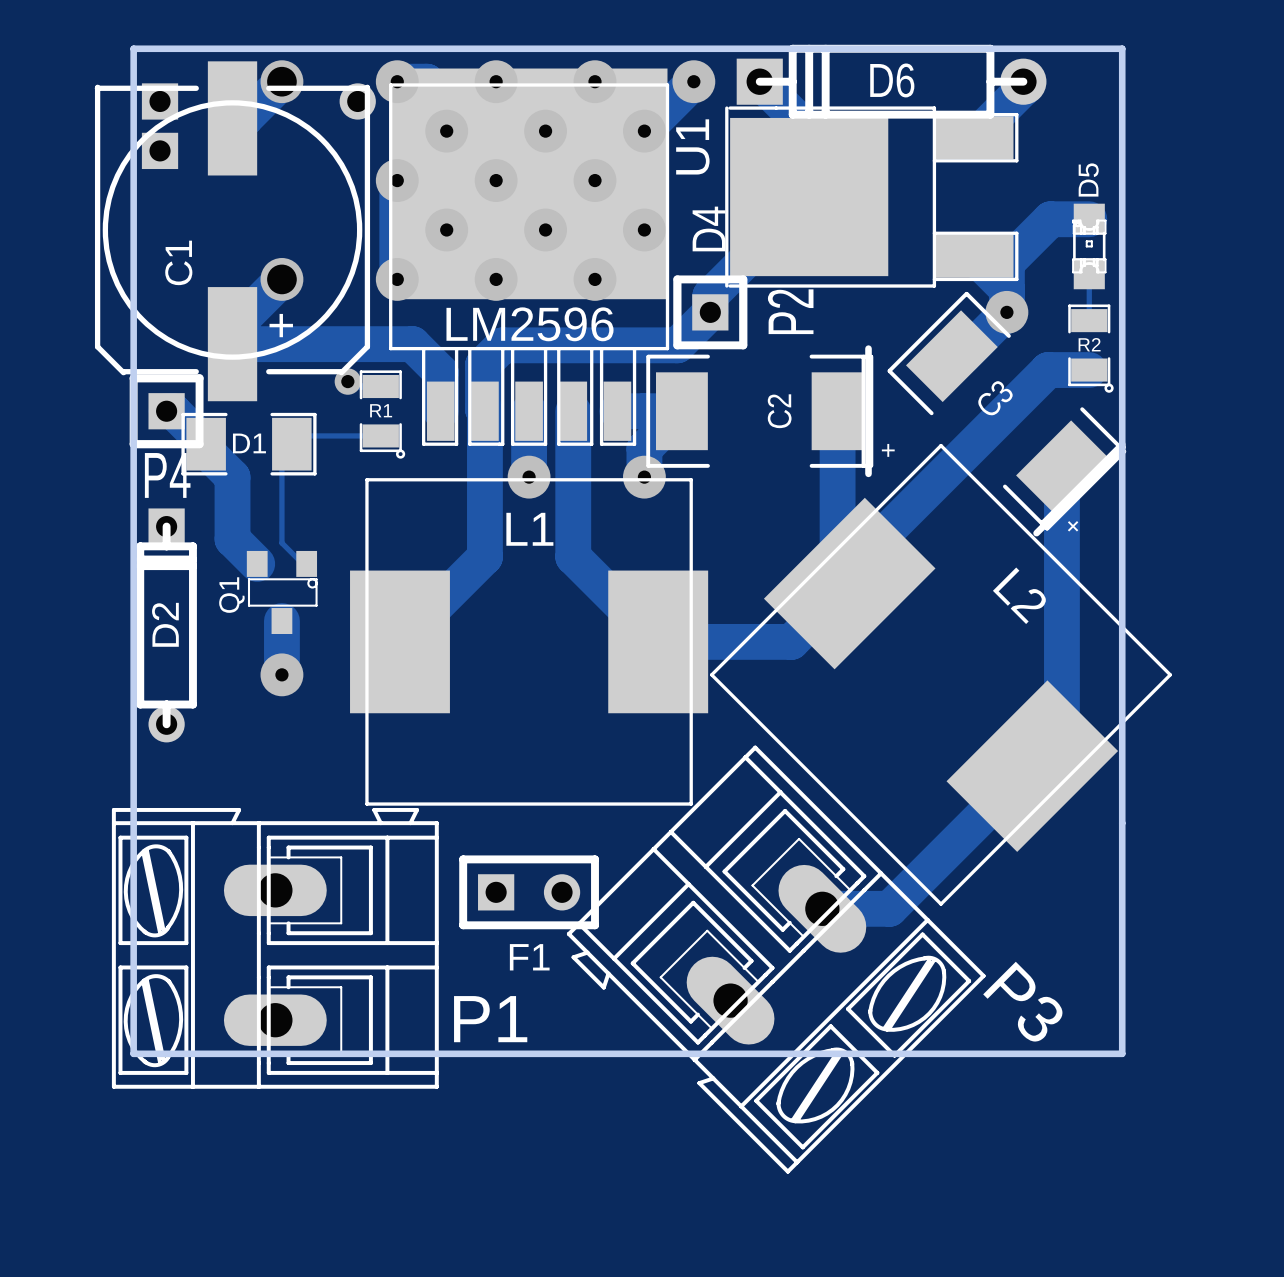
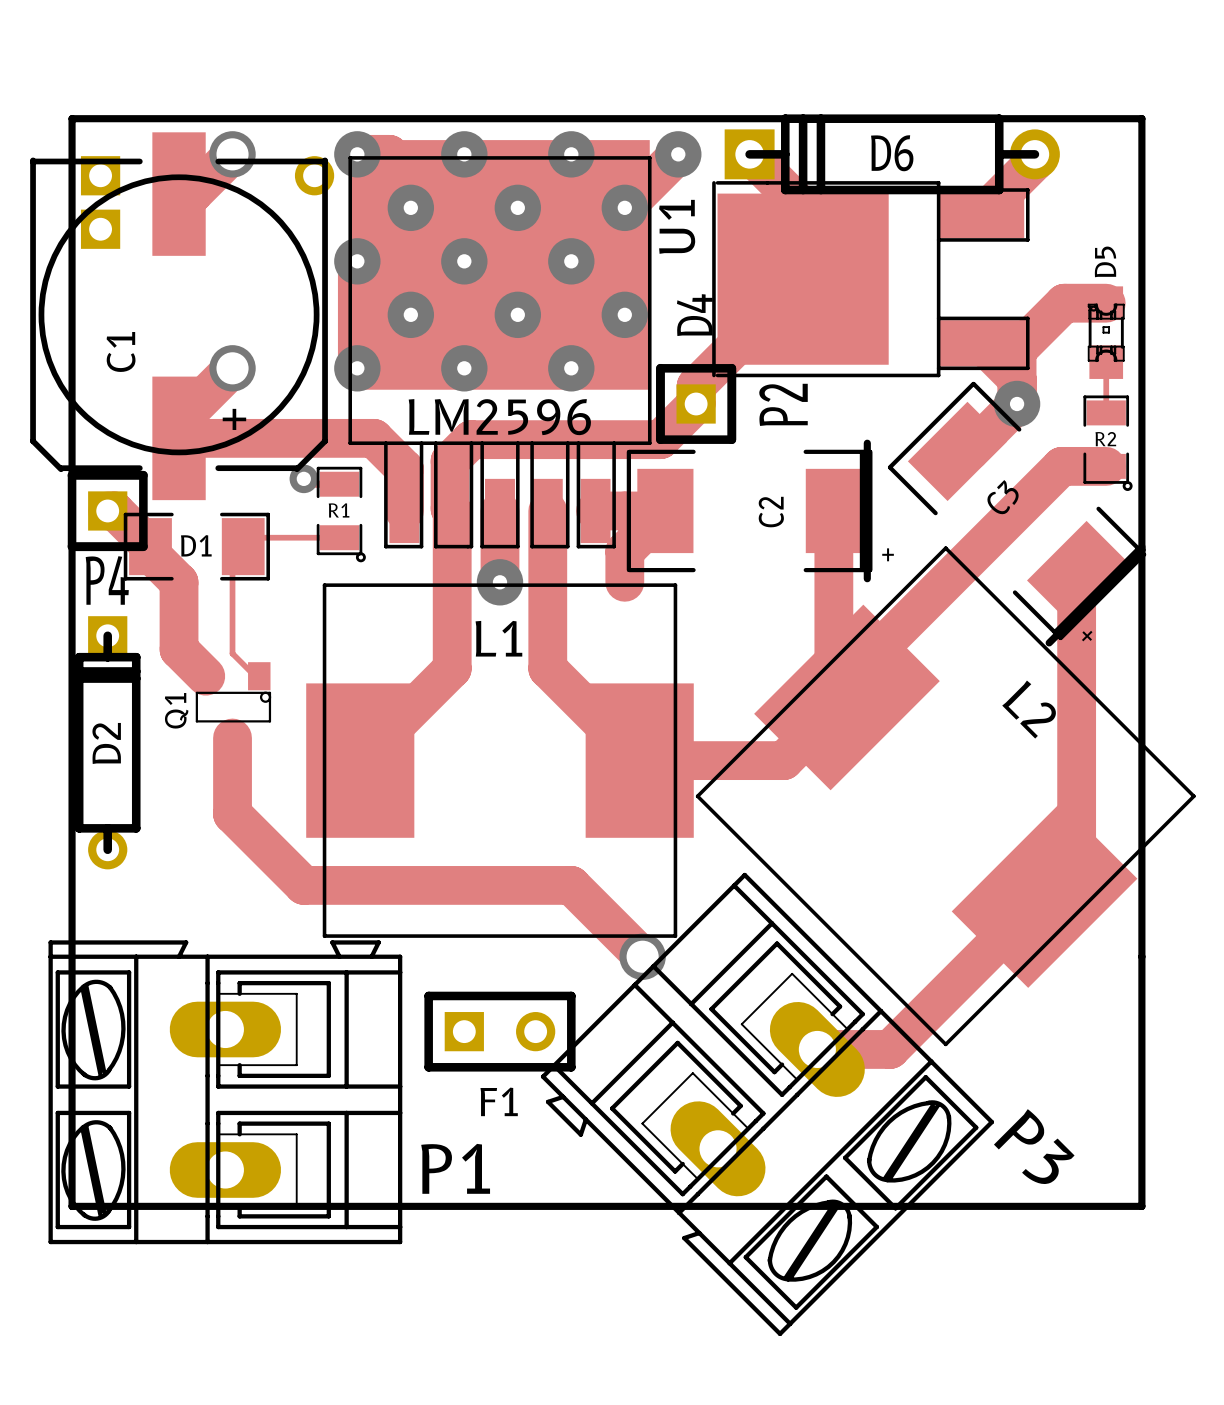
via: (644, 477) -> none
track: none -> (232, 796) (232, 814) (303, 885) (571, 885) (642, 956)
via: (281, 674) -> none
via: none -> (642, 956)

